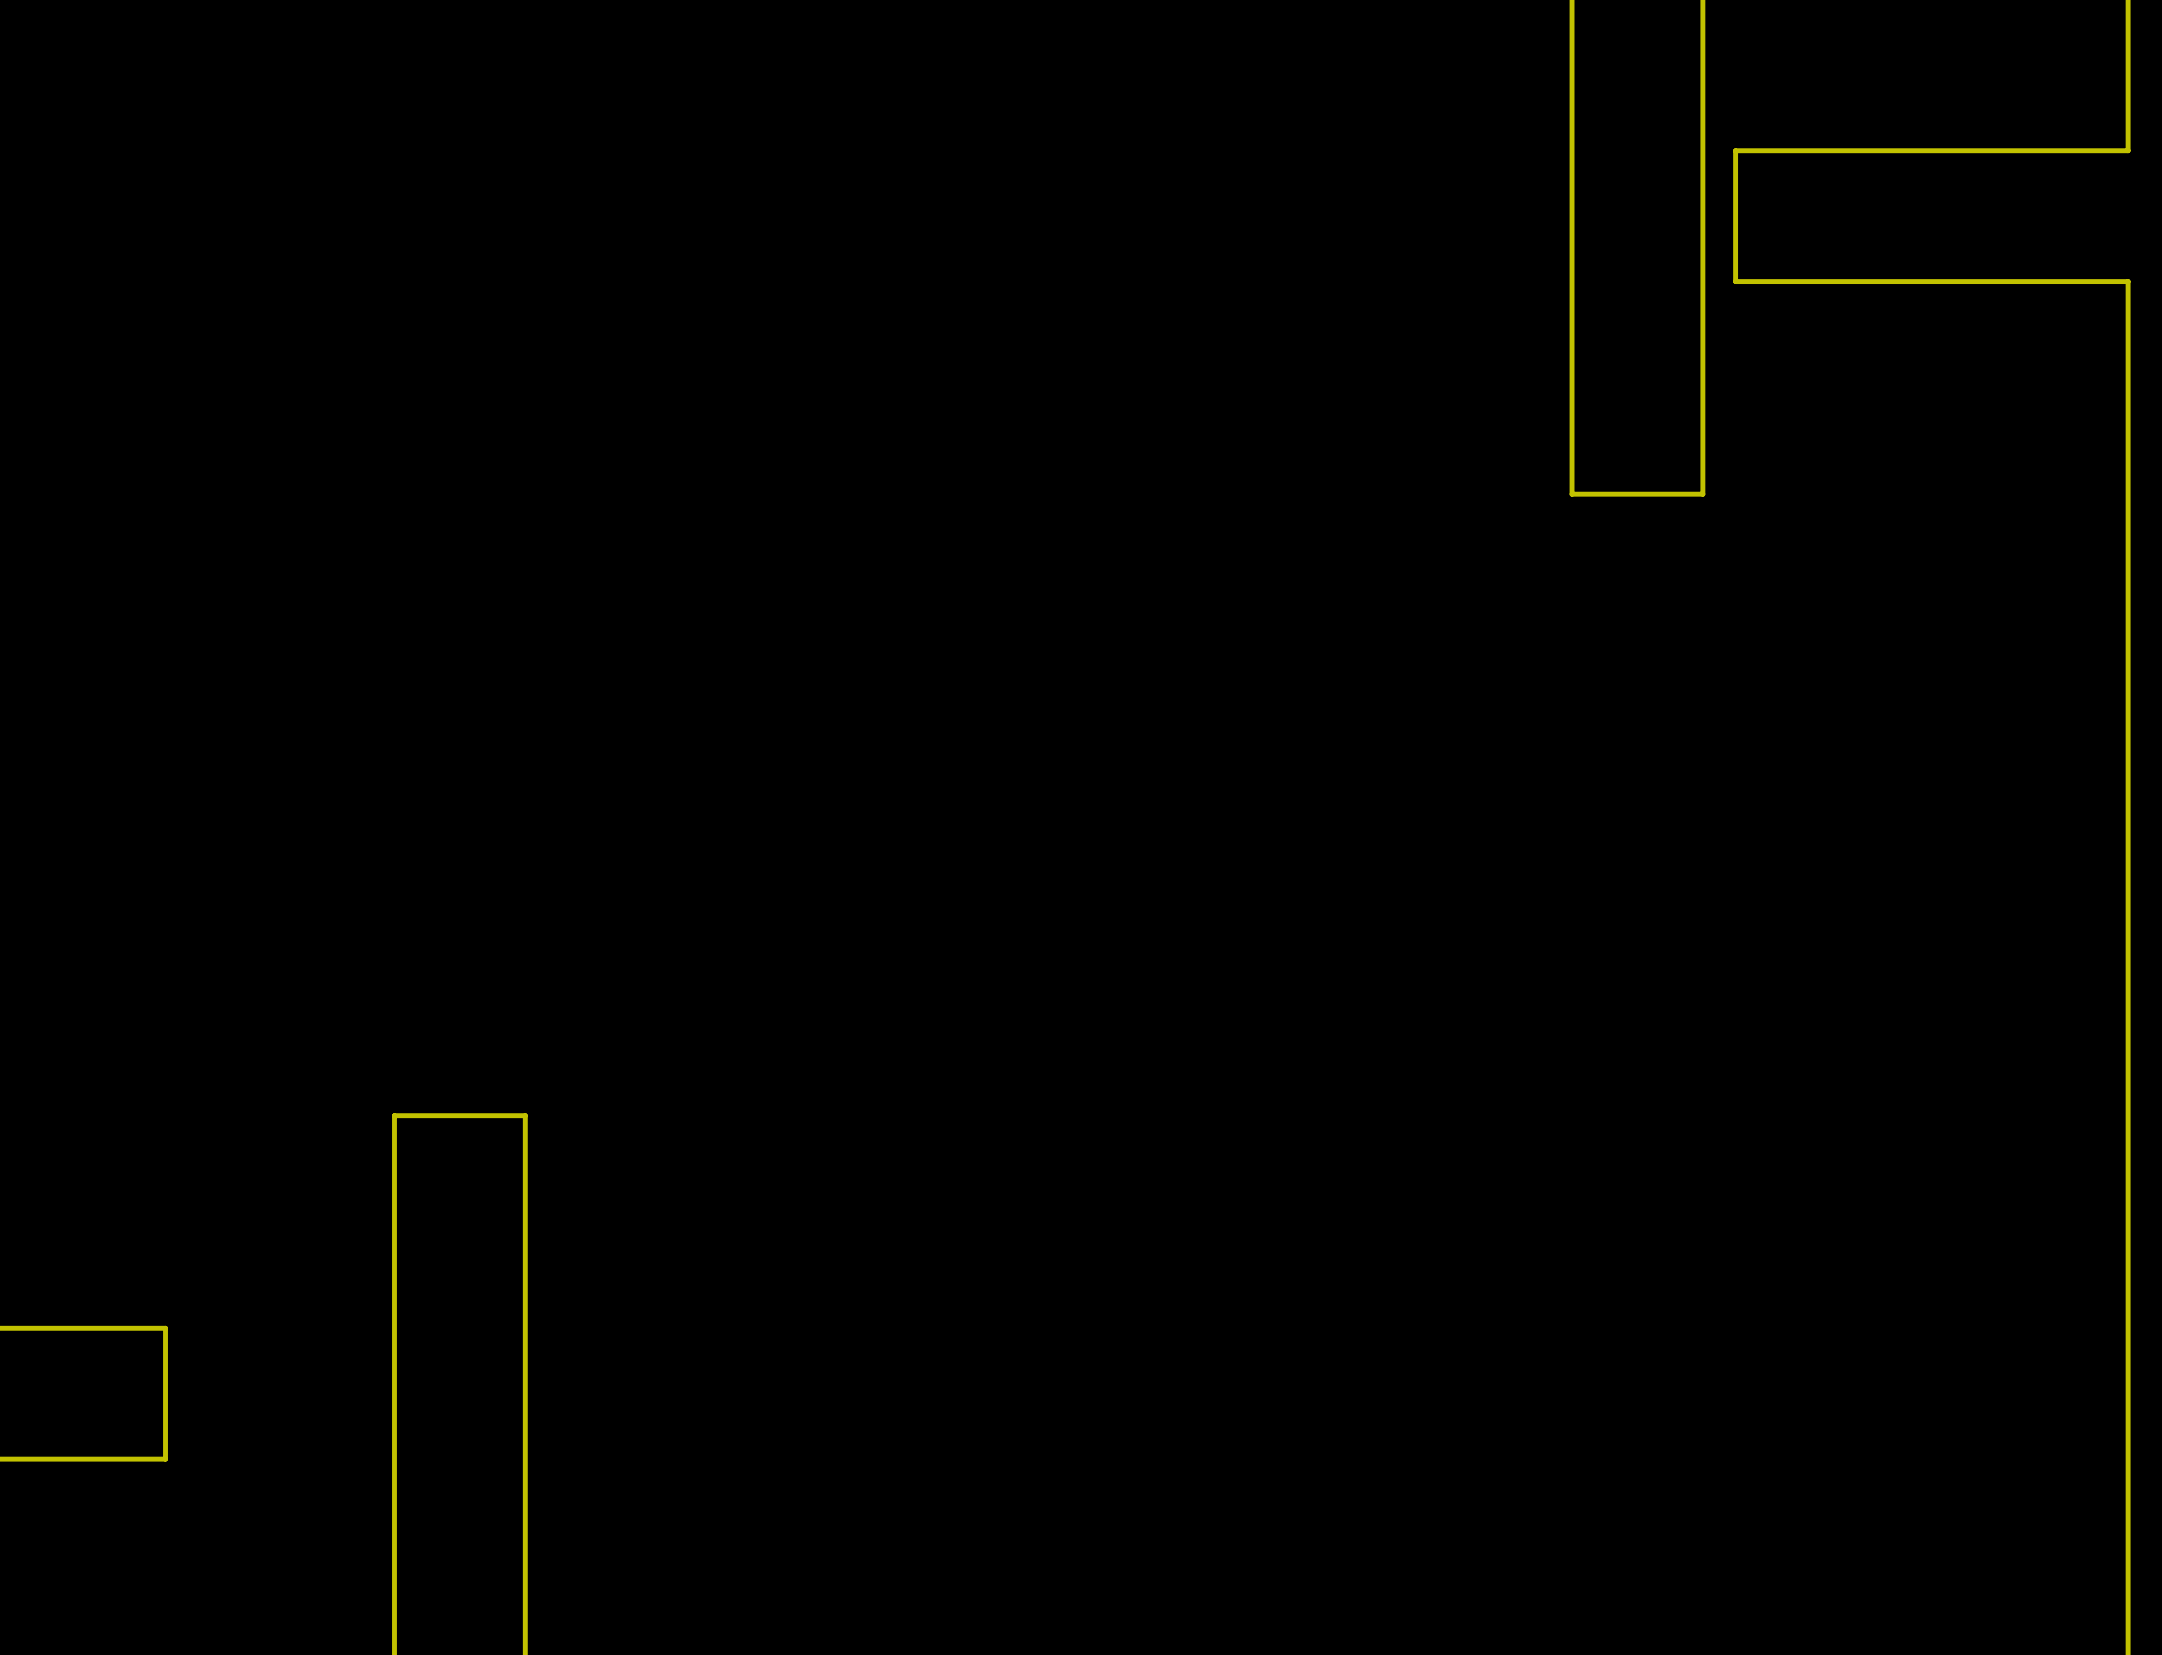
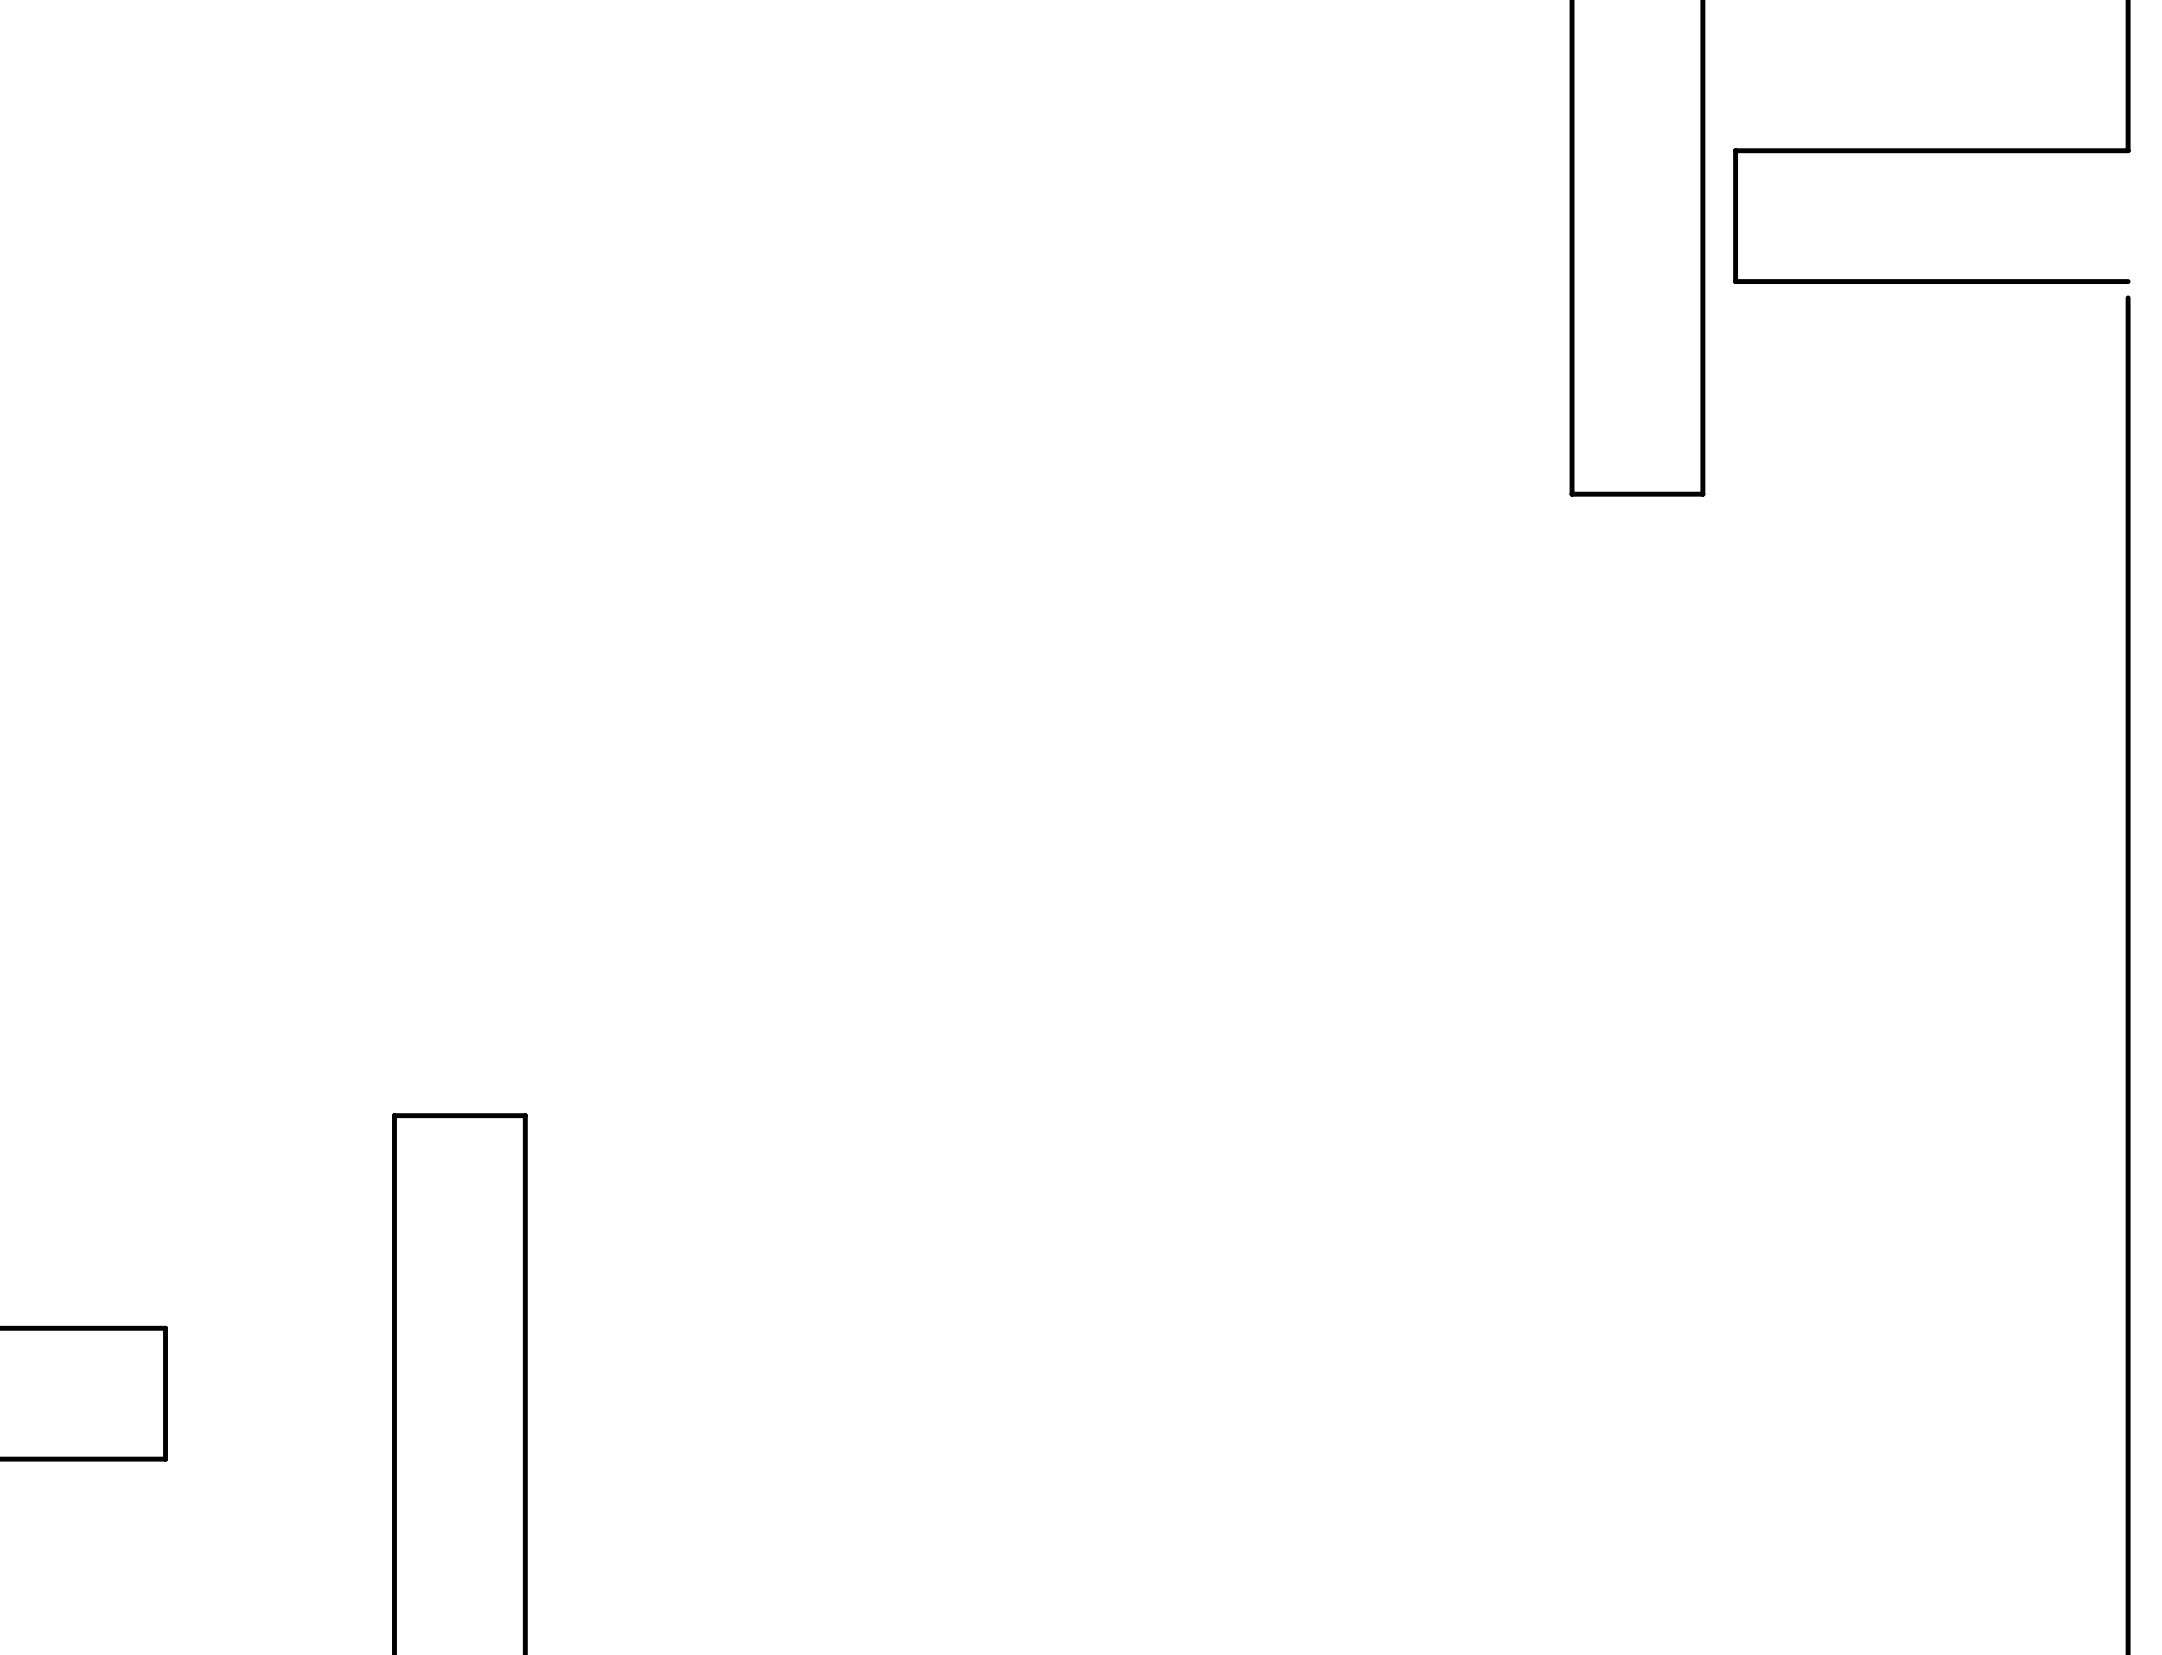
board edge: (2128, 281) (2128, 297) -> none

